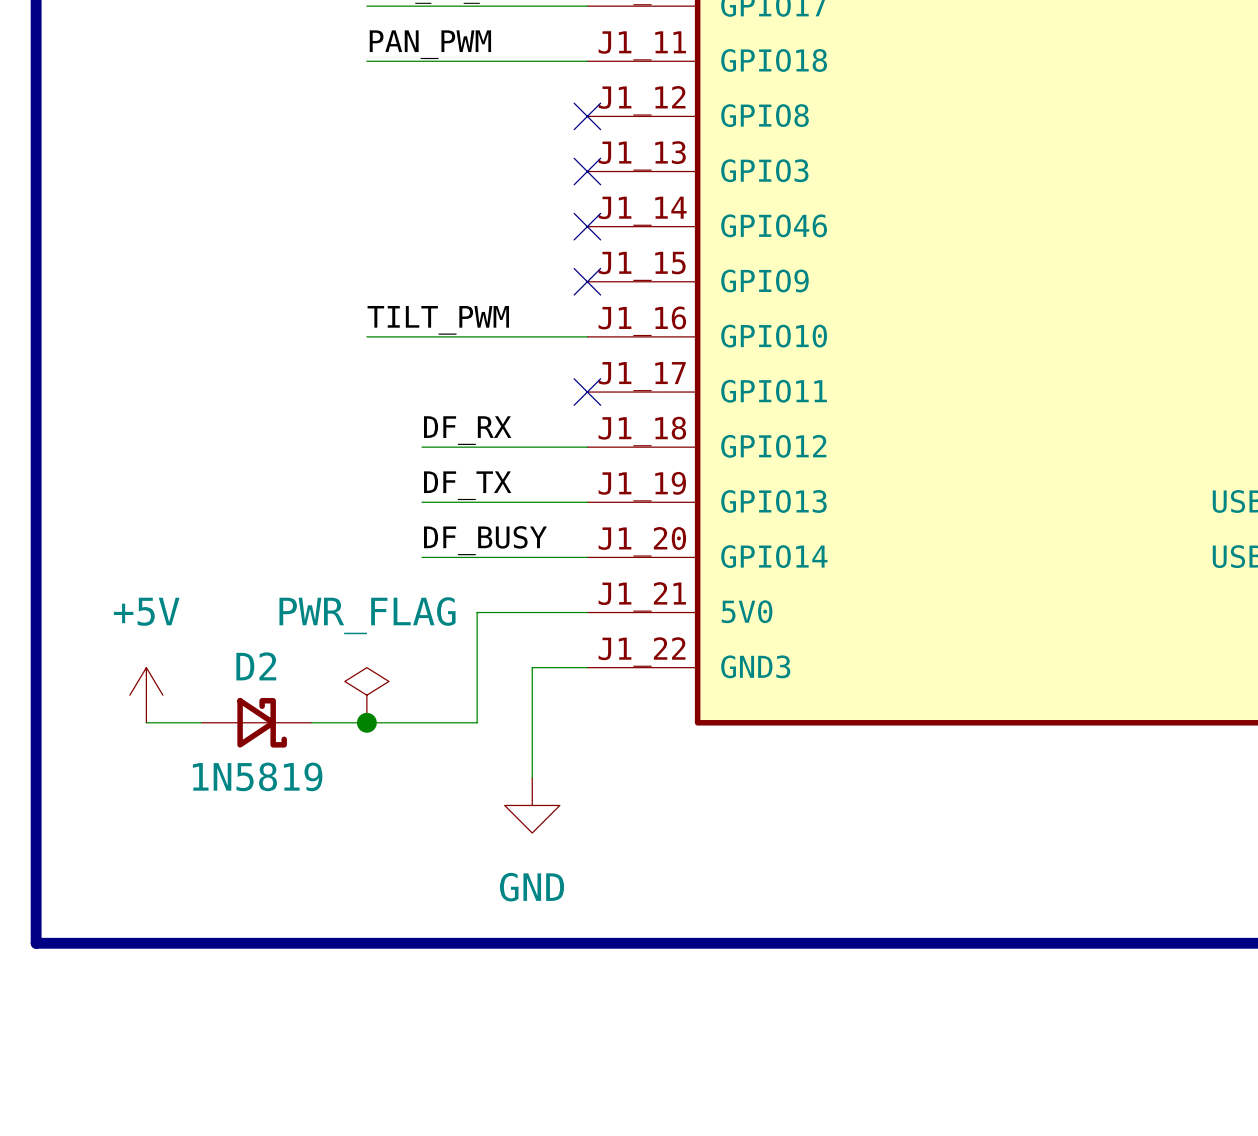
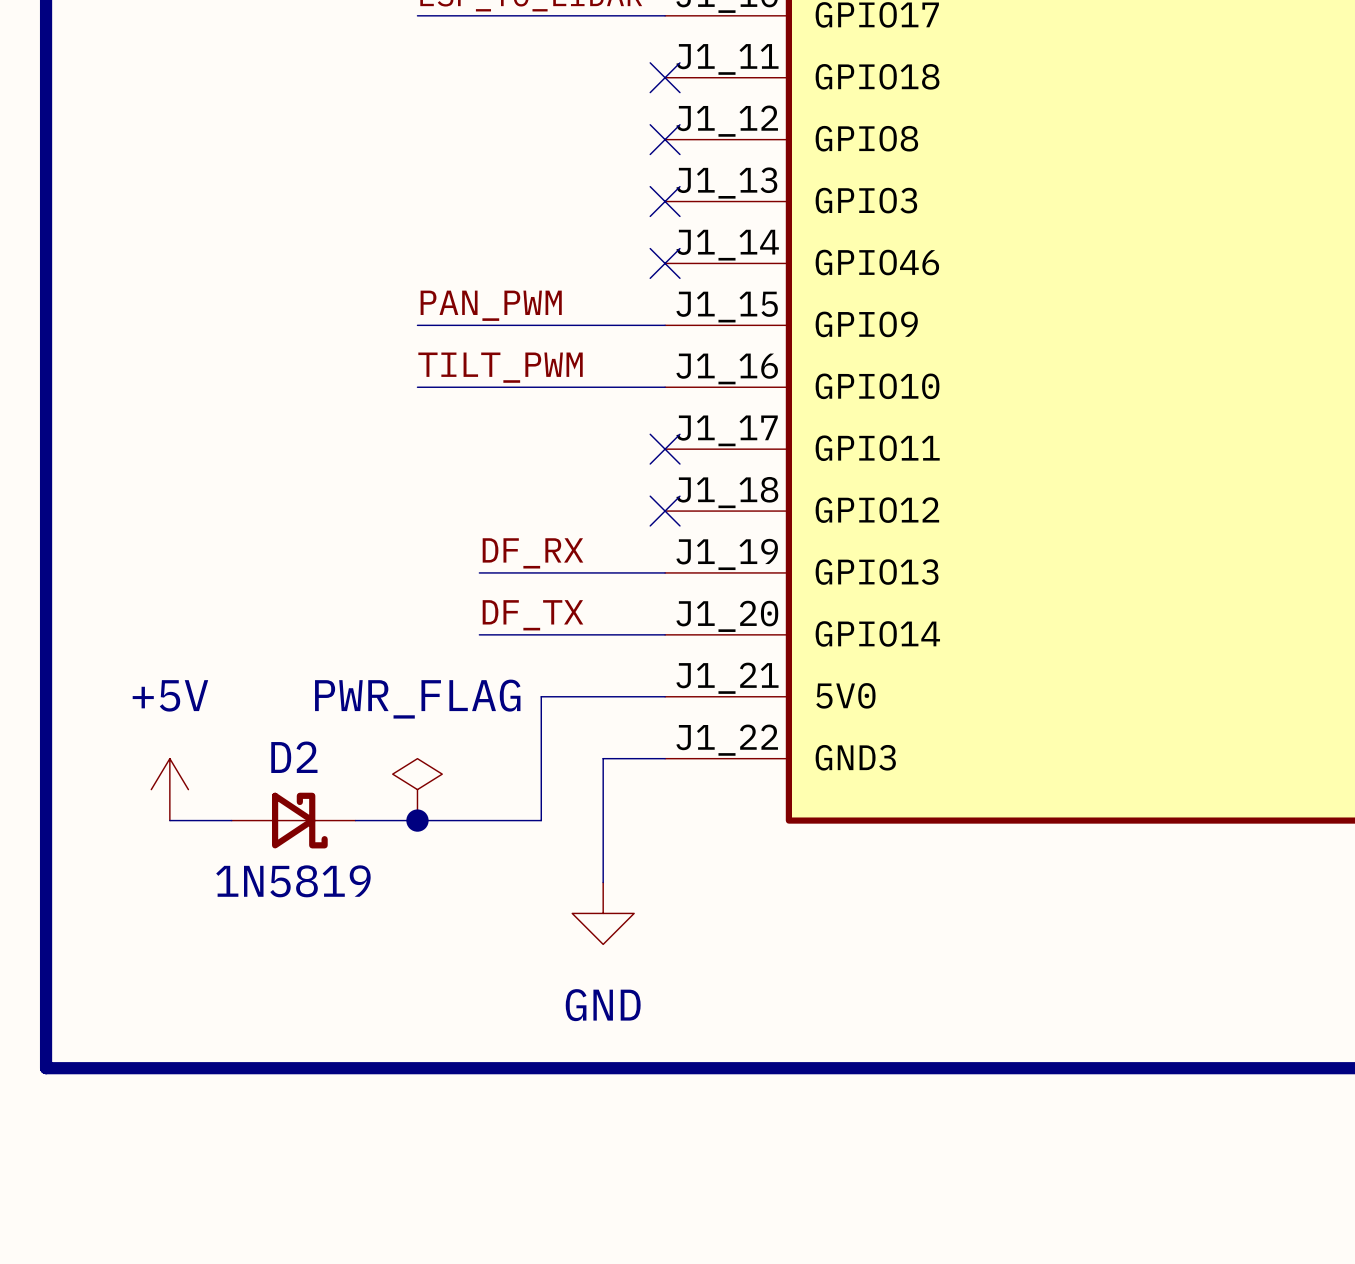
label position: PAN_PWM (430, 44) -> PAN_PWM (491, 305)
wire: (366, 61) (587, 61) -> (417, 325) (665, 325)
no-connect mark: none -> (665, 77)
no-connect mark: (587, 281) -> none
label: DF_RX (467, 430) -> none
wire: (422, 447) (587, 447) -> none
no-connect mark: none -> (665, 511)
label: DF_TX (467, 485) -> DF_RX (532, 553)
label: DF_BUSY (485, 540) -> DF_TX (532, 615)

